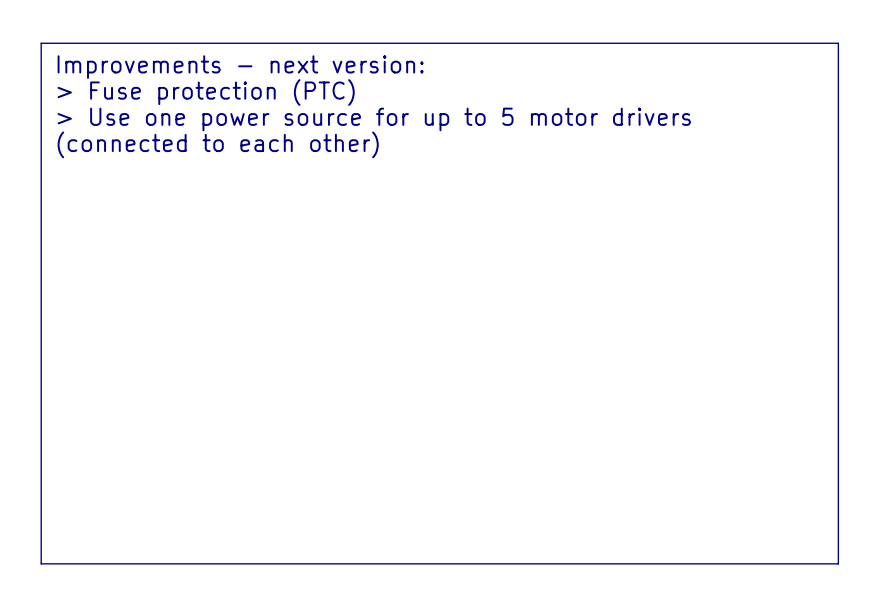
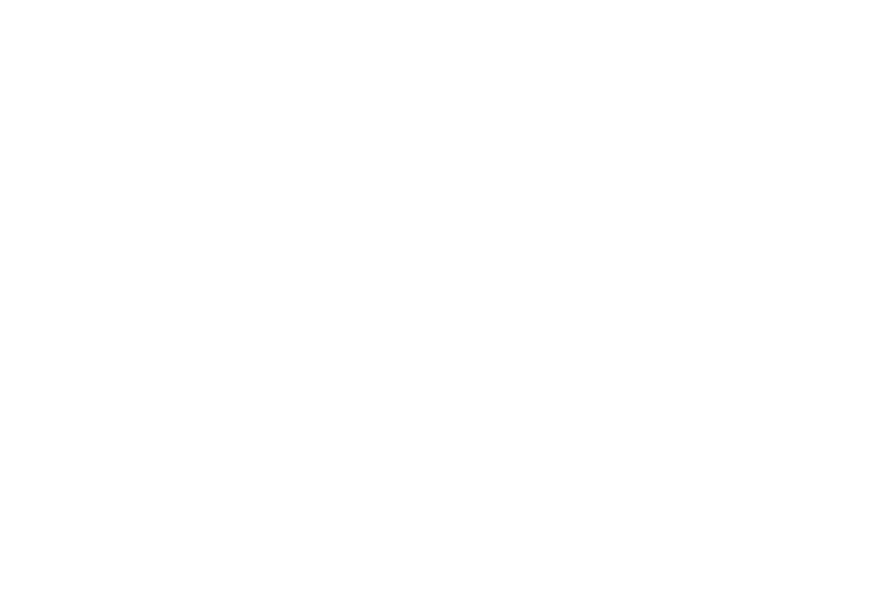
line: (41, 43) (838, 43) (838, 563) (41, 563) (41, 43) -> none
text: Improvements - next version: (240, 67) -> none
text: > Fuse protection (PTC) (206, 92) -> none
text: > Use one power source for up to 5 motor drivers (374, 119) -> none
text: (connected to each other) (218, 144) -> none

